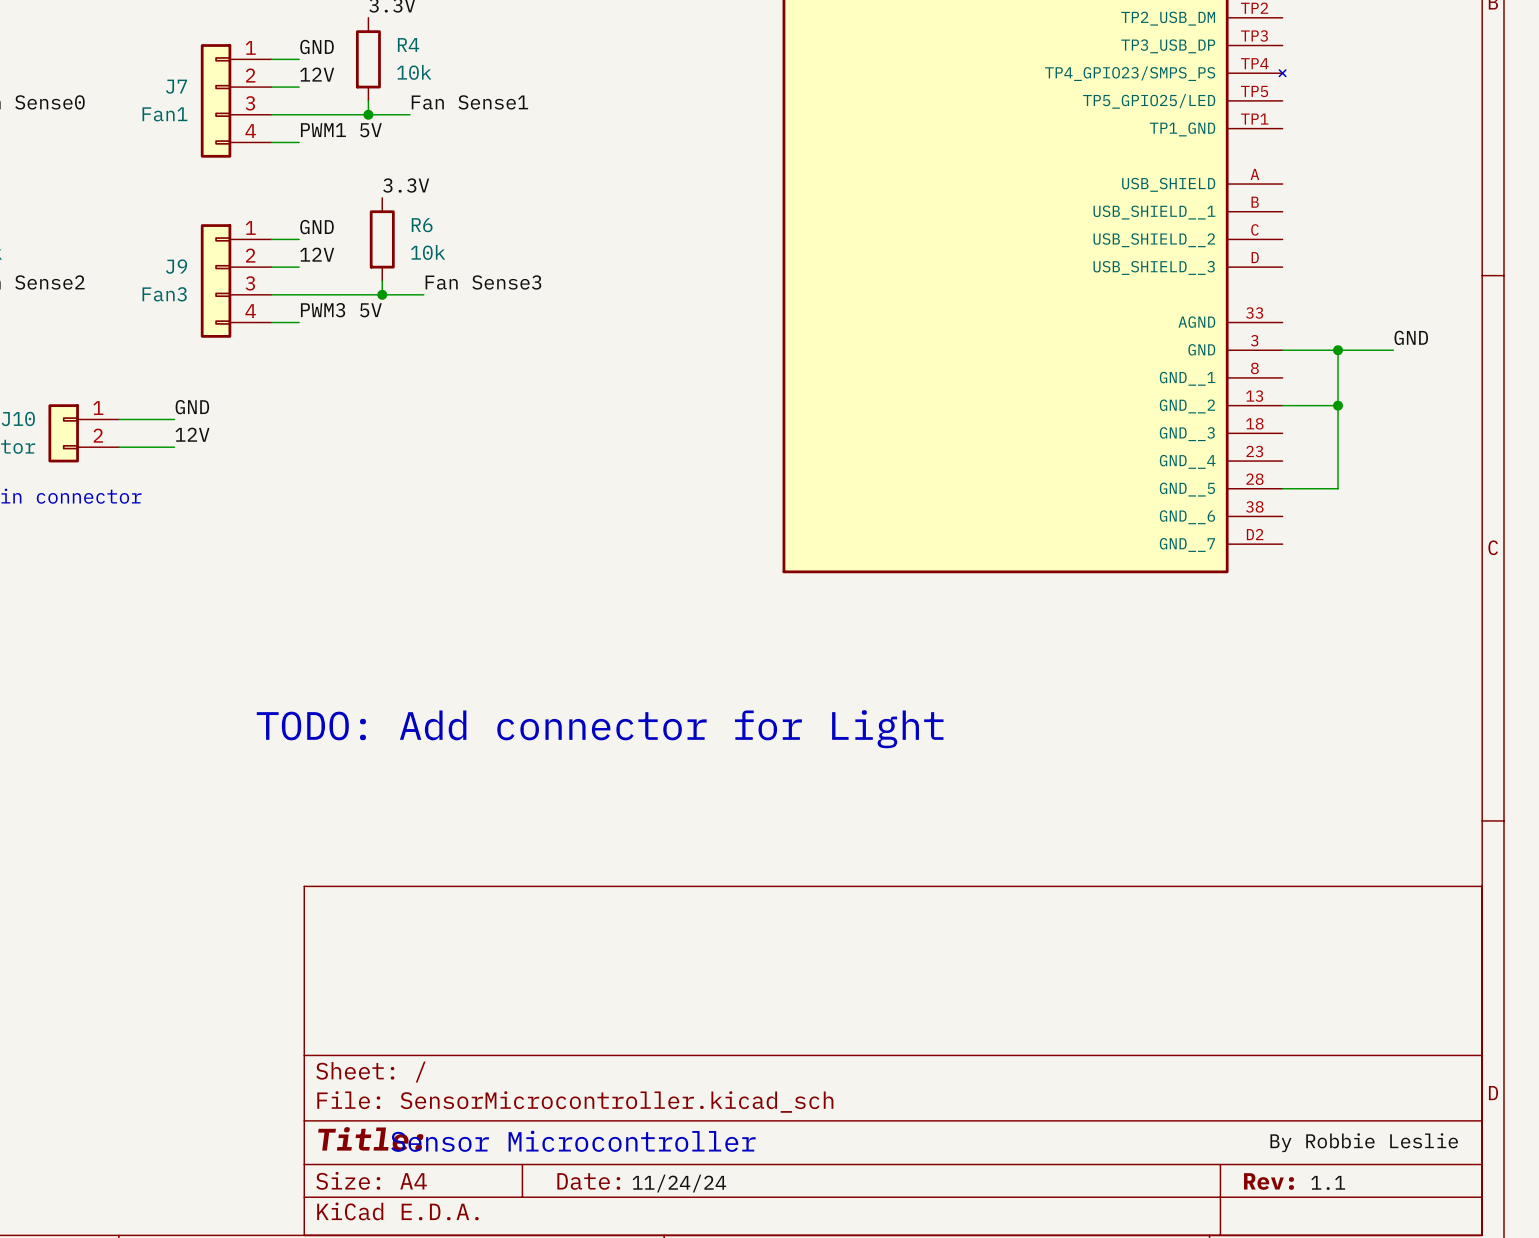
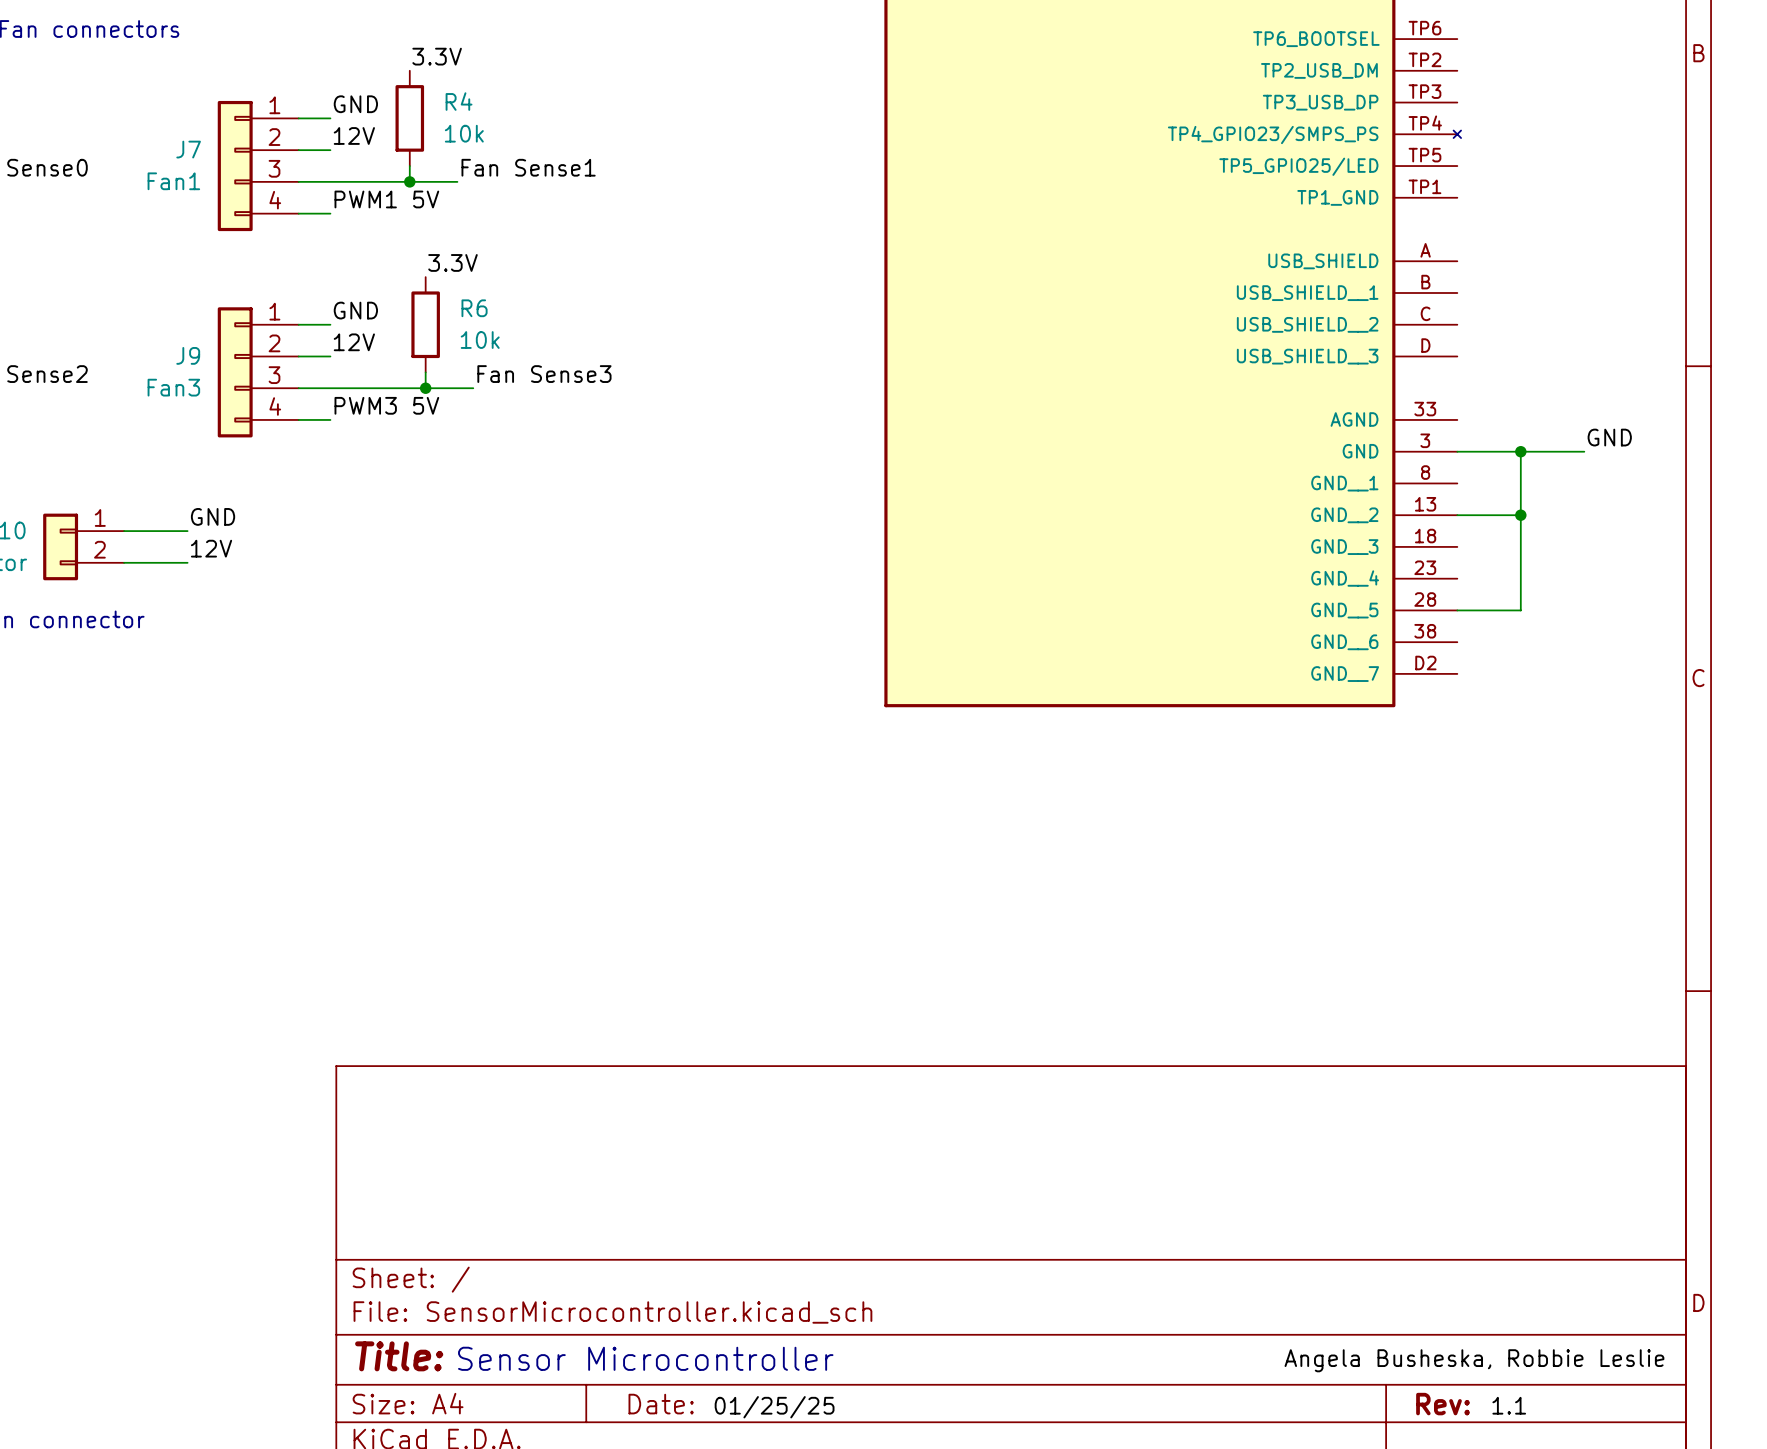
text: TODO: Add connector for Light (600, 729) -> none
label: By Robbie Leslie (1364, 1142) -> Angela Busheska, Robbie Leslie (1474, 1360)
label: 11/24/24 (679, 1183) -> 01/25/25 (774, 1407)

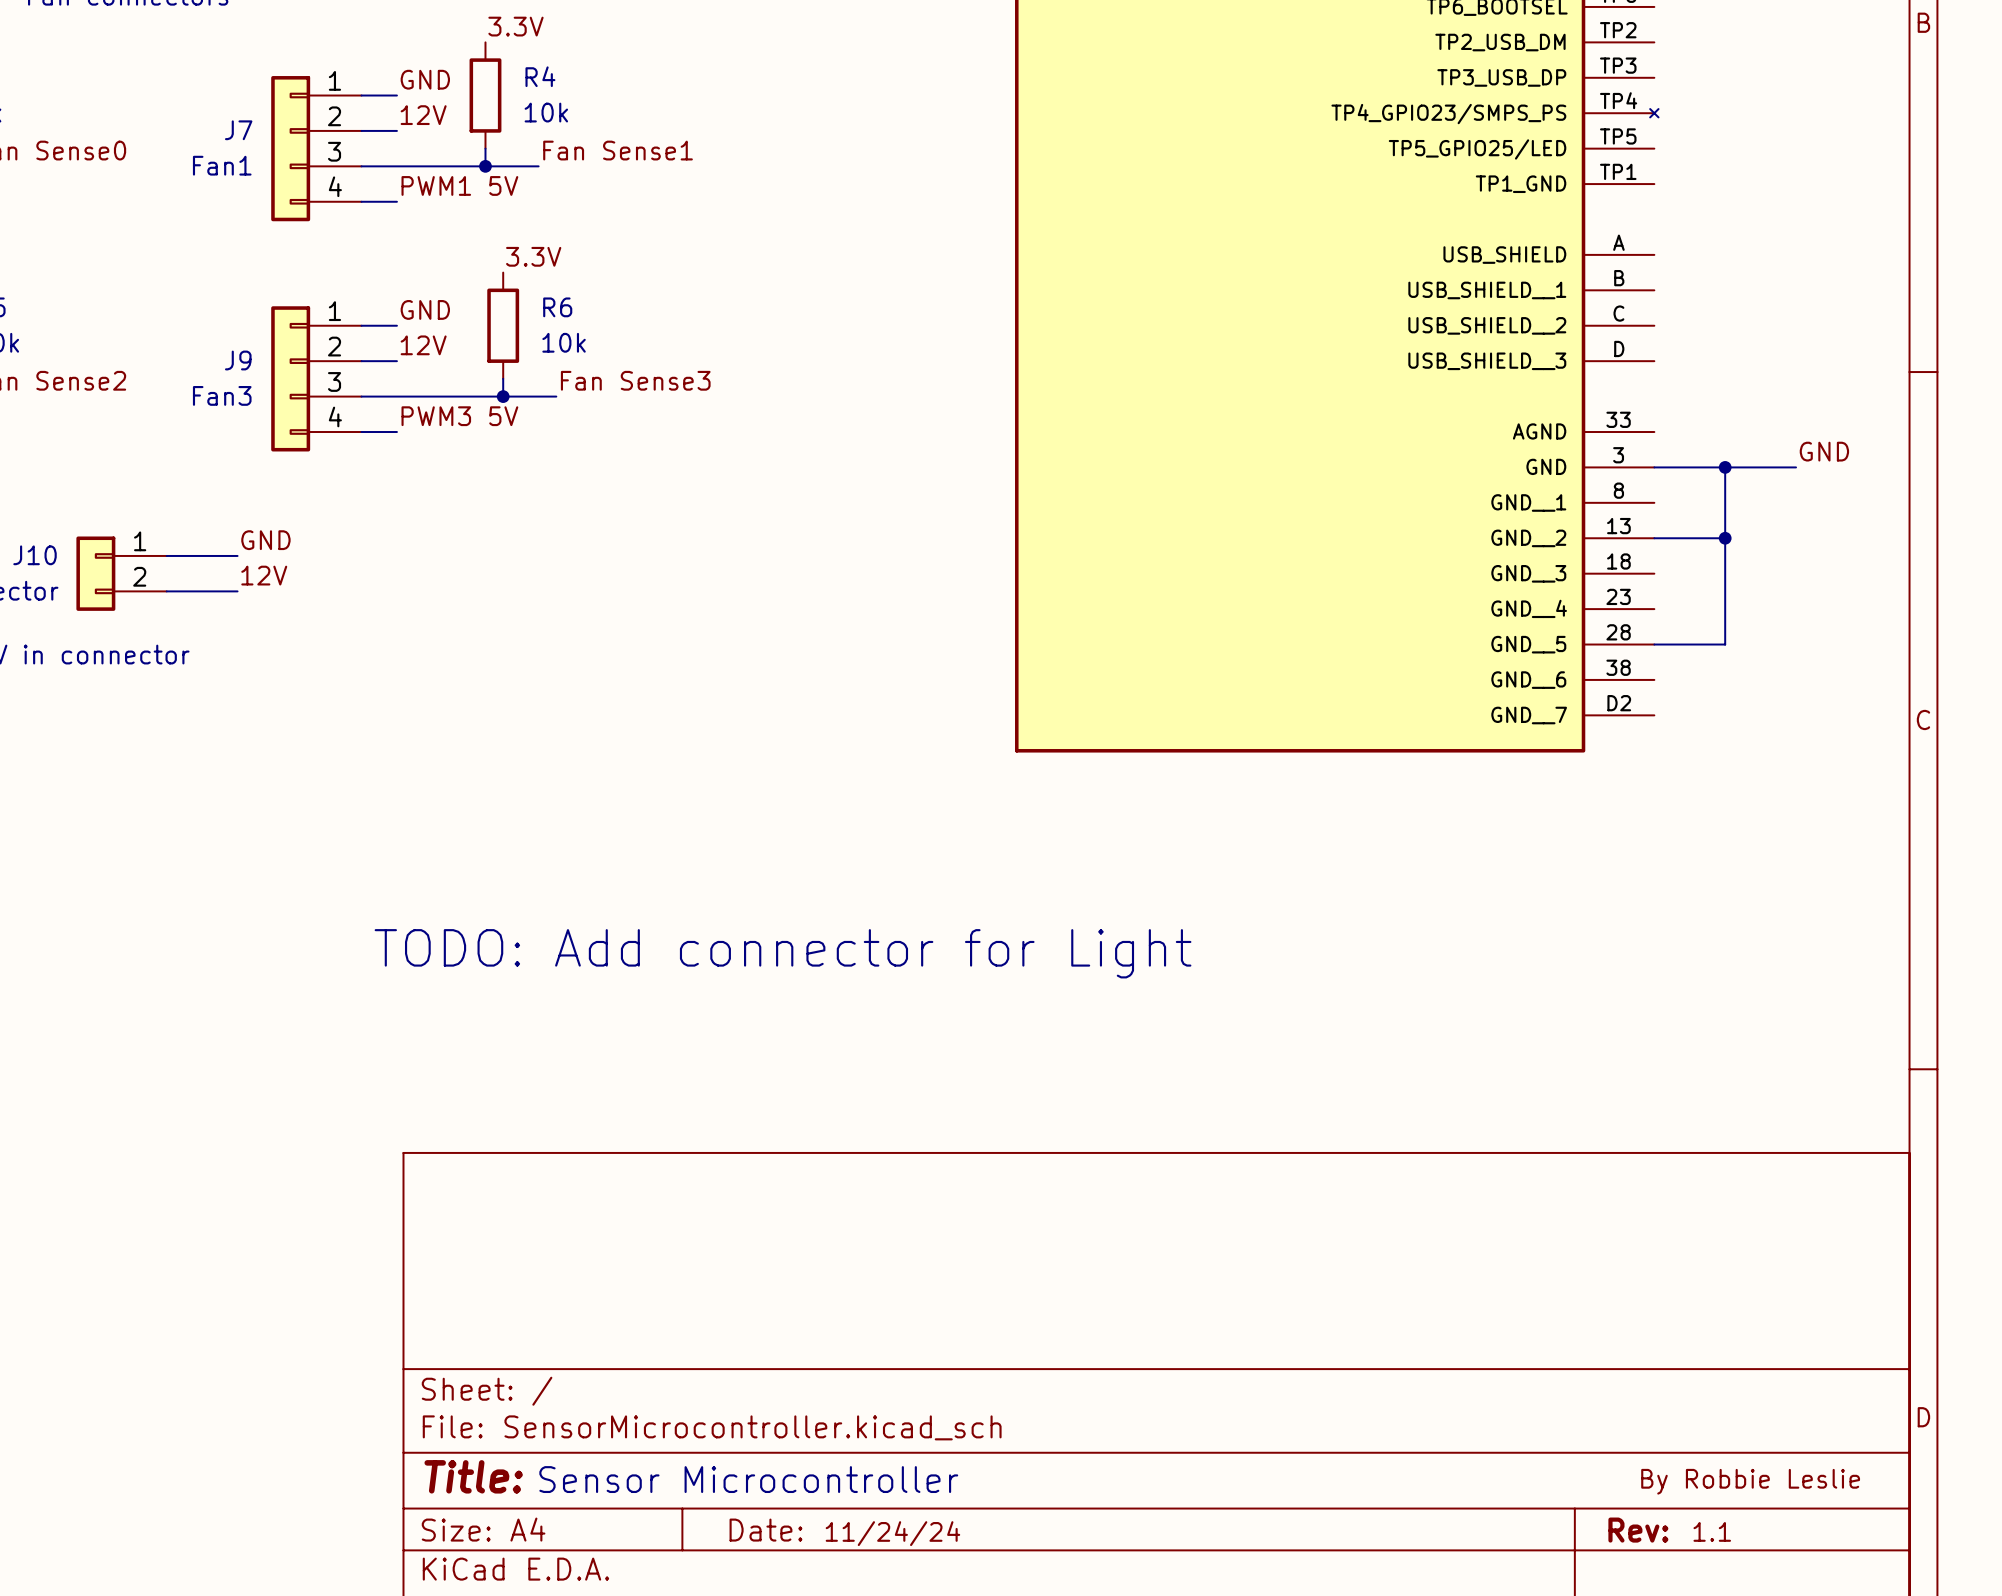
text: none -> TODO: Add connector for Light (783, 953)
label: Angela Busheska, Robbie Leslie (1474, 1360) -> By Robbie Leslie (1750, 1481)
label: 01/25/25 (774, 1407) -> 11/24/24 (892, 1533)

